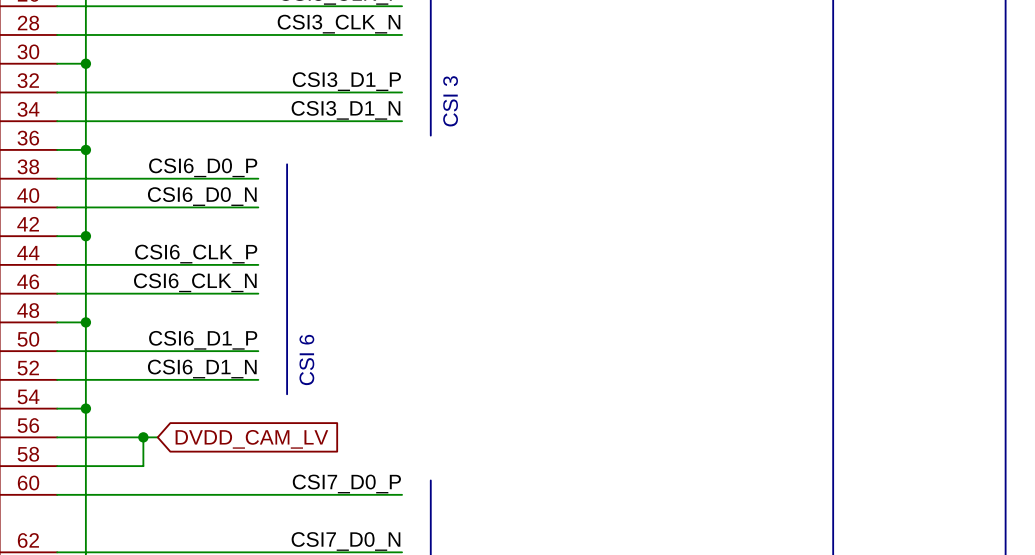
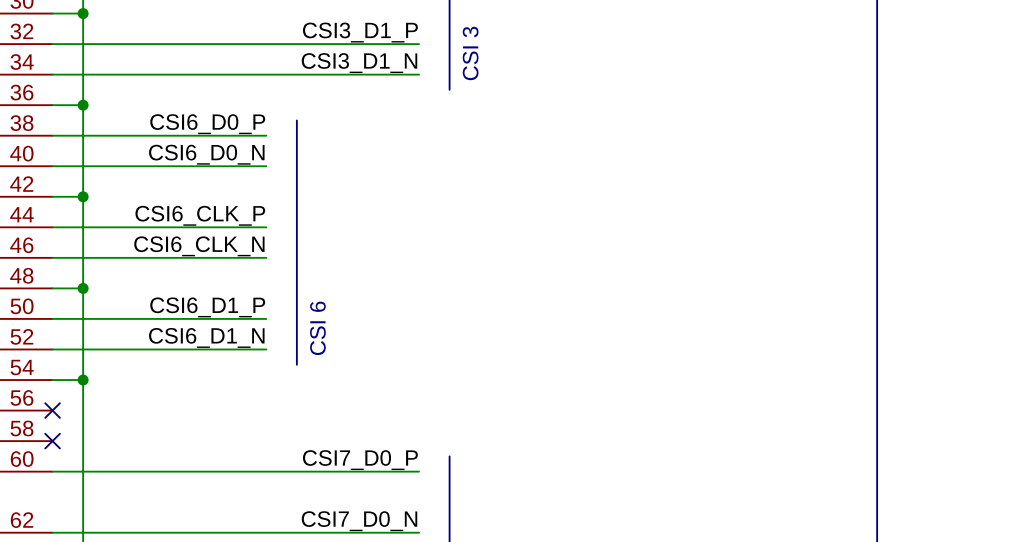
wire: (57, 437) (157, 437) -> none
no-connect mark: none -> (52, 410)
wire: (143, 437) (143, 466) (57, 466) -> none
junction: (143, 437) -> none
global label: DVDD_CAM_LV (251, 439) -> none
no-connect mark: none -> (52, 441)

